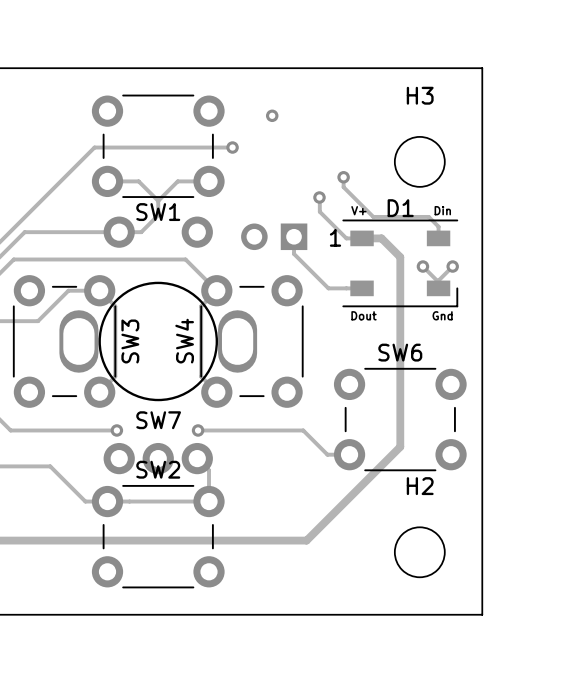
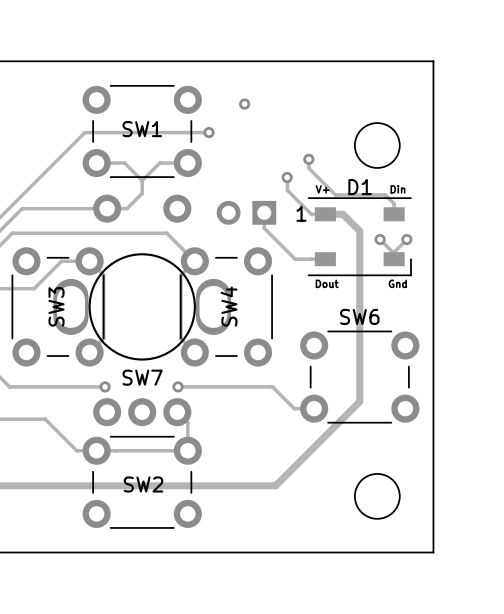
H3 name: H3 (420, 95) -> none
SW1 name position: SW1 (158, 212) -> SW1 (142, 129)
SW3 name position: SW3 (130, 341) -> SW3 (56, 306)
SW4 name position: SW4 (184, 341) -> SW4 (229, 306)
SW2 name position: SW2 (158, 469) -> SW2 (143, 484)
H2 name: H2 (420, 486) -> none

